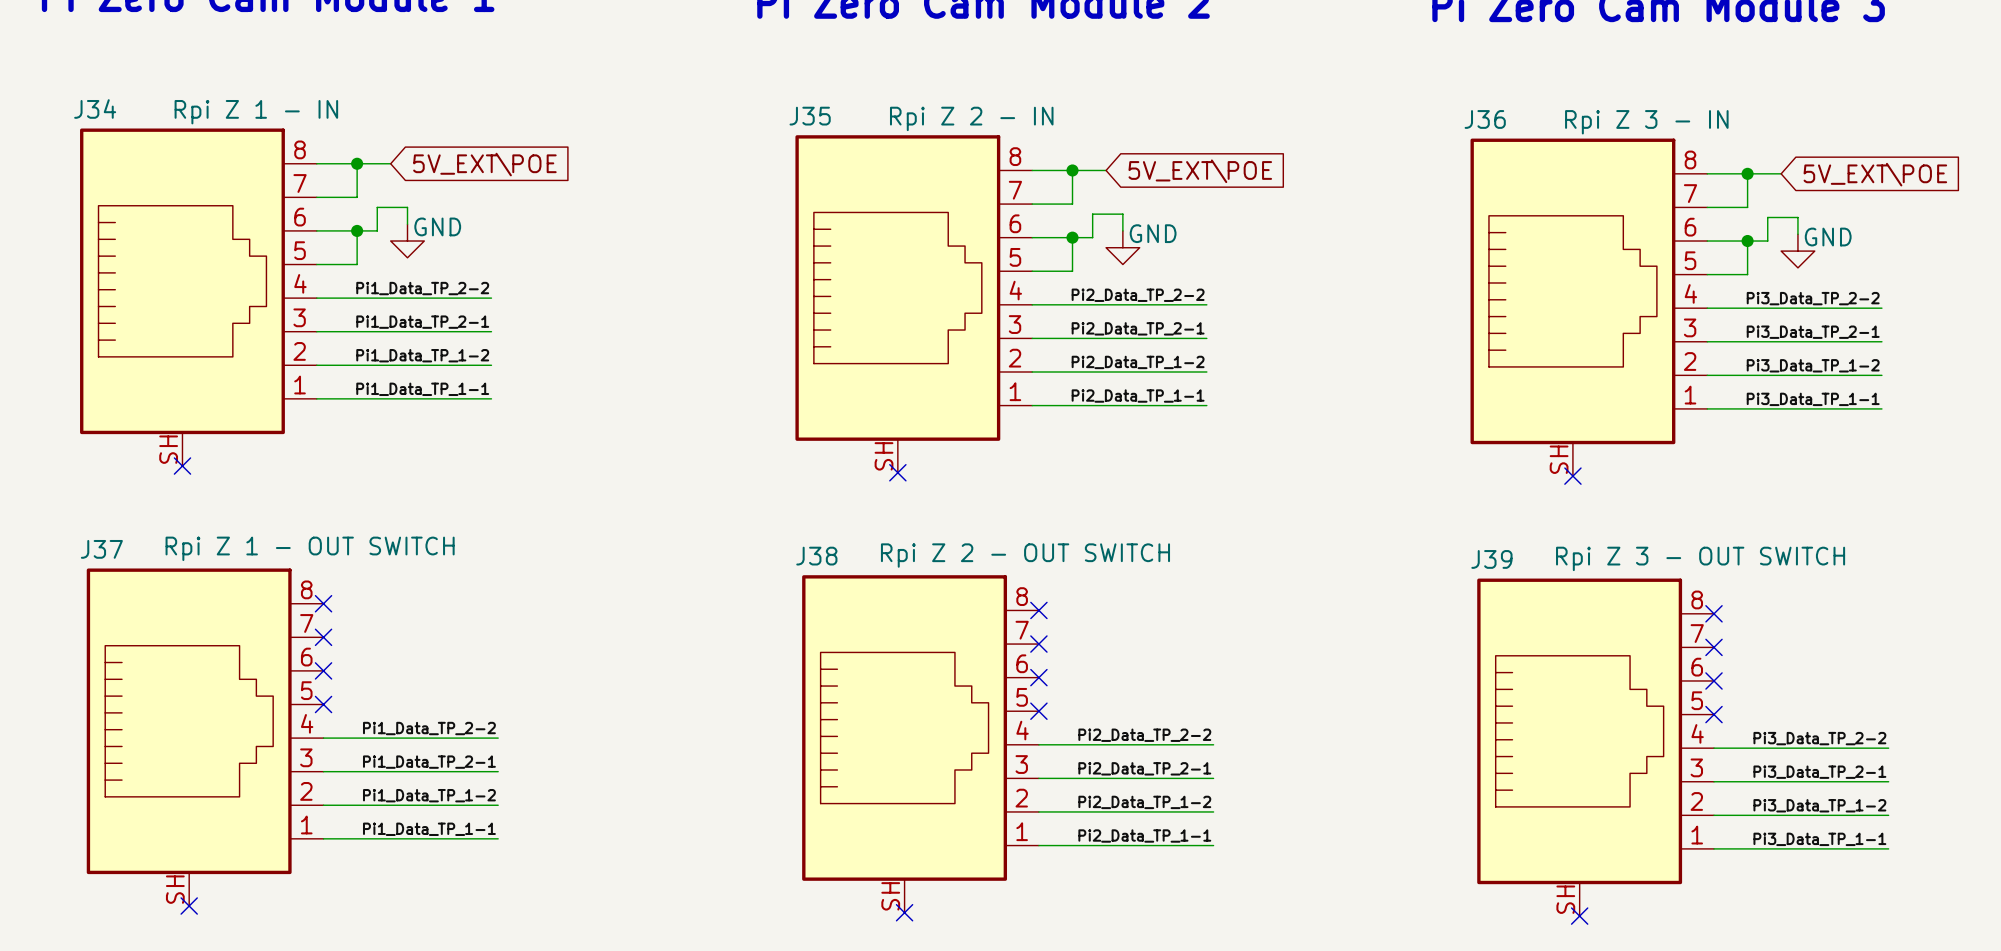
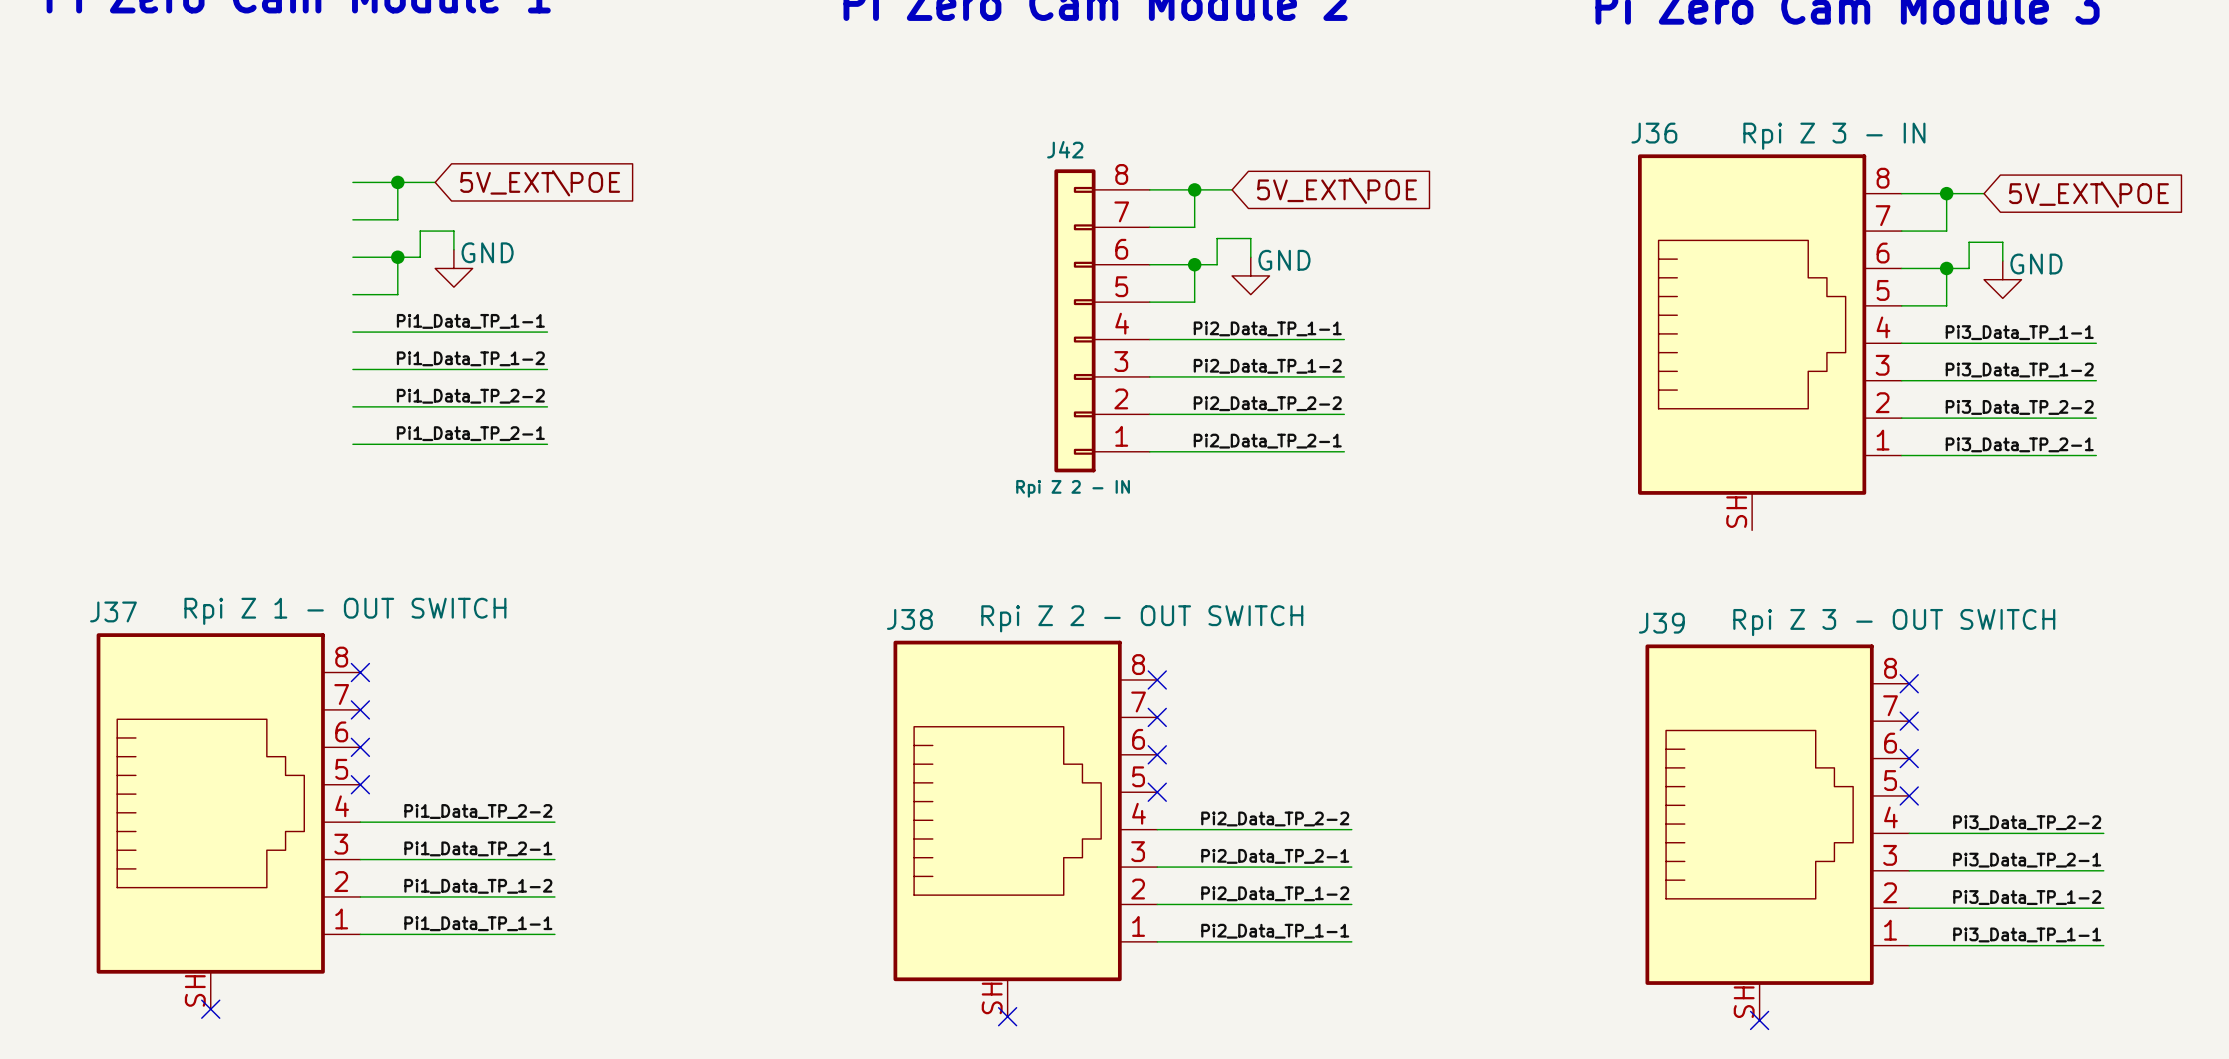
label: Pi1_Data_TP_2-2 (422, 288) -> Pi1_Data_TP_1-1 (470, 321)
J42: none -> Rpi Z 2 - IN (1102, 320)
label: Pi2_Data_TP_2-2 (1138, 295) -> Pi2_Data_TP_1-1 (1267, 328)
J34: Rpi Z 1 - IN (198, 297) -> none
label: Pi3_Data_TP_2-2 (1813, 298) -> Pi3_Data_TP_1-1 (2019, 332)
J35: Rpi Z 2 - IN (913, 303) -> none
label: Pi1_Data_TP_2-1 (422, 322) -> Pi1_Data_TP_1-2 (470, 358)
label: Pi2_Data_TP_2-1 (1138, 328) -> Pi2_Data_TP_1-2 (1267, 366)
label: Pi3_Data_TP_2-1 (1813, 332) -> Pi3_Data_TP_1-2 (2019, 370)
label: Pi1_Data_TP_1-2 (422, 355) -> Pi1_Data_TP_2-2 (470, 396)
label: Pi2_Data_TP_1-2 (1138, 362) -> Pi2_Data_TP_2-2 (1267, 403)
label: Pi3_Data_TP_1-2 (1813, 365) -> Pi3_Data_TP_2-2 (2019, 407)
label: Pi1_Data_TP_1-1 (422, 389) -> Pi1_Data_TP_2-1 (470, 433)
label: Pi2_Data_TP_1-1 (1138, 396) -> Pi2_Data_TP_2-1 (1267, 441)
label: Pi3_Data_TP_1-1 (1813, 399) -> Pi3_Data_TP_2-1 (2019, 444)
no-connect mark: (182, 466) -> none
no-connect mark: (897, 472) -> none
no-connect mark: (1572, 476) -> none

